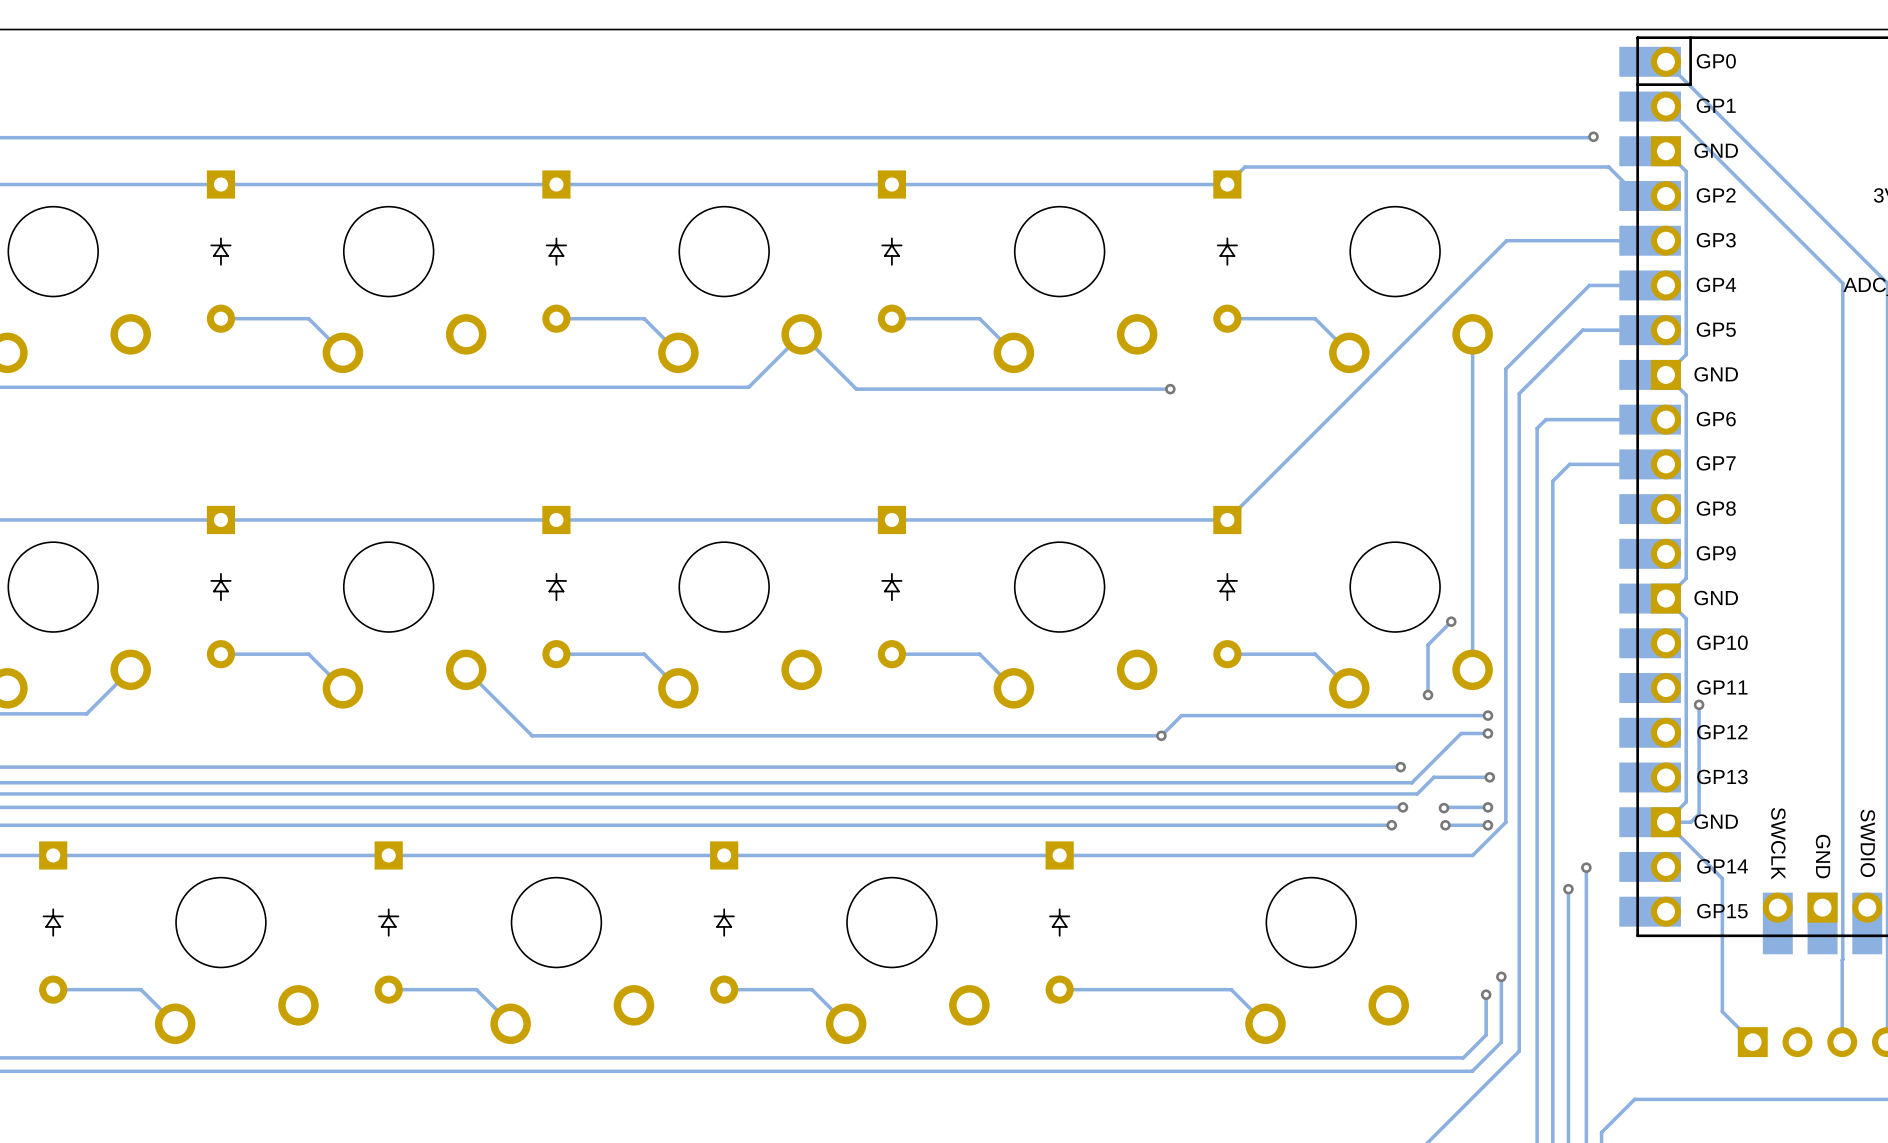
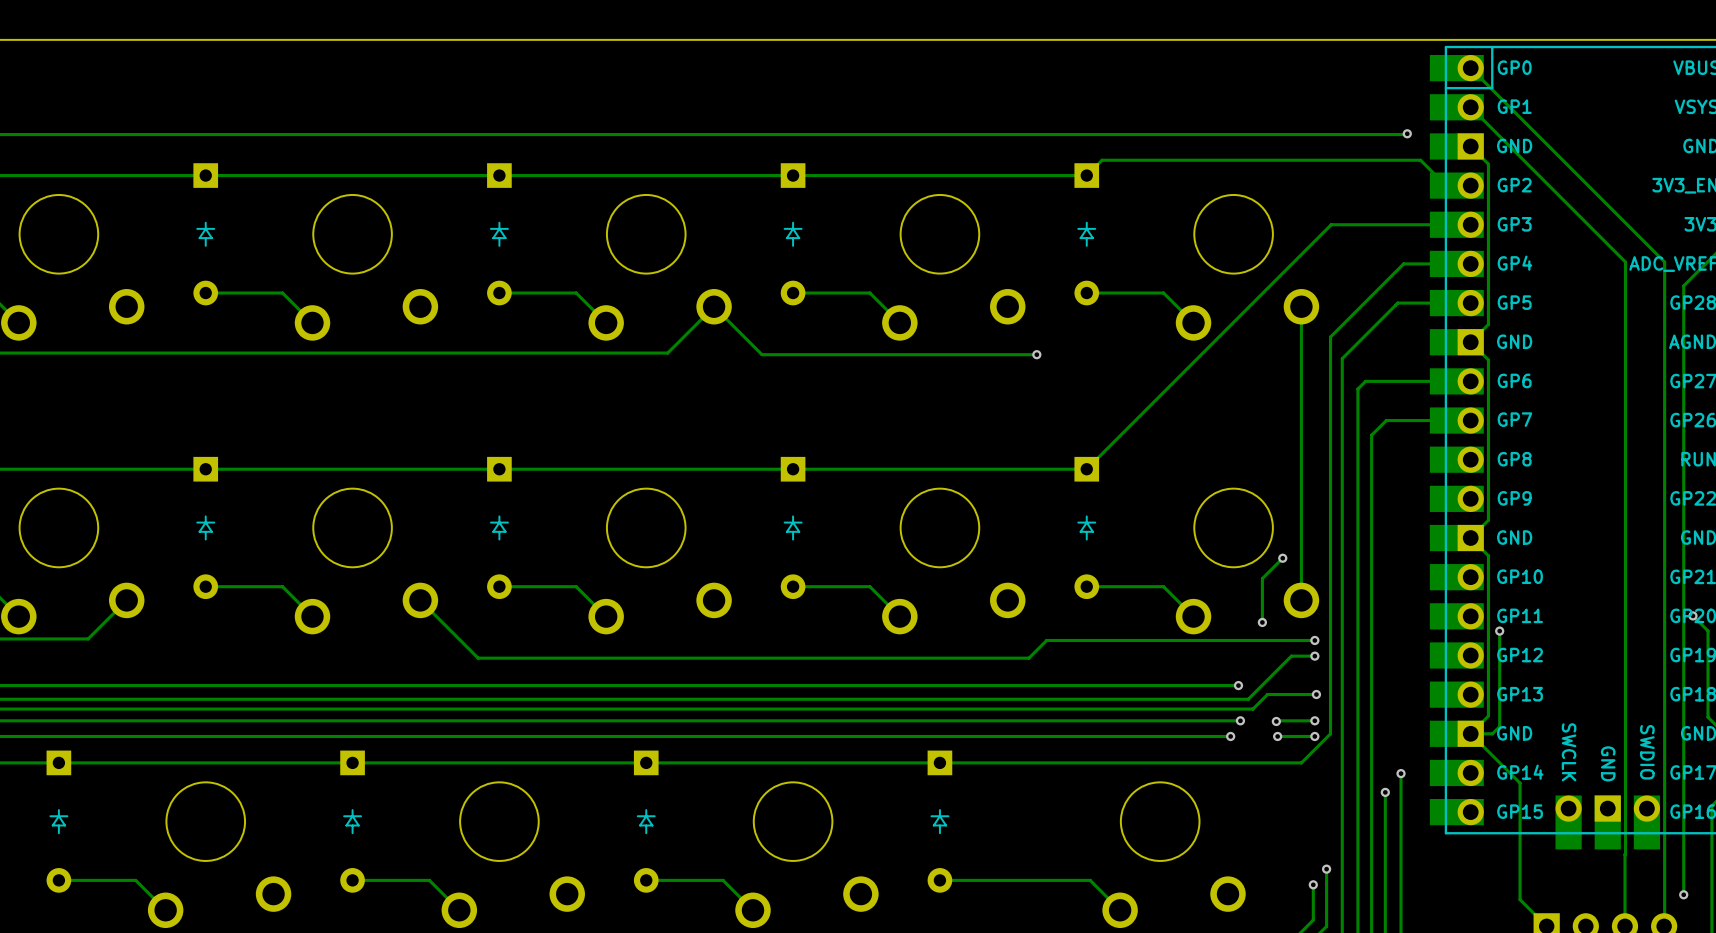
via: (1161, 735) -> none

